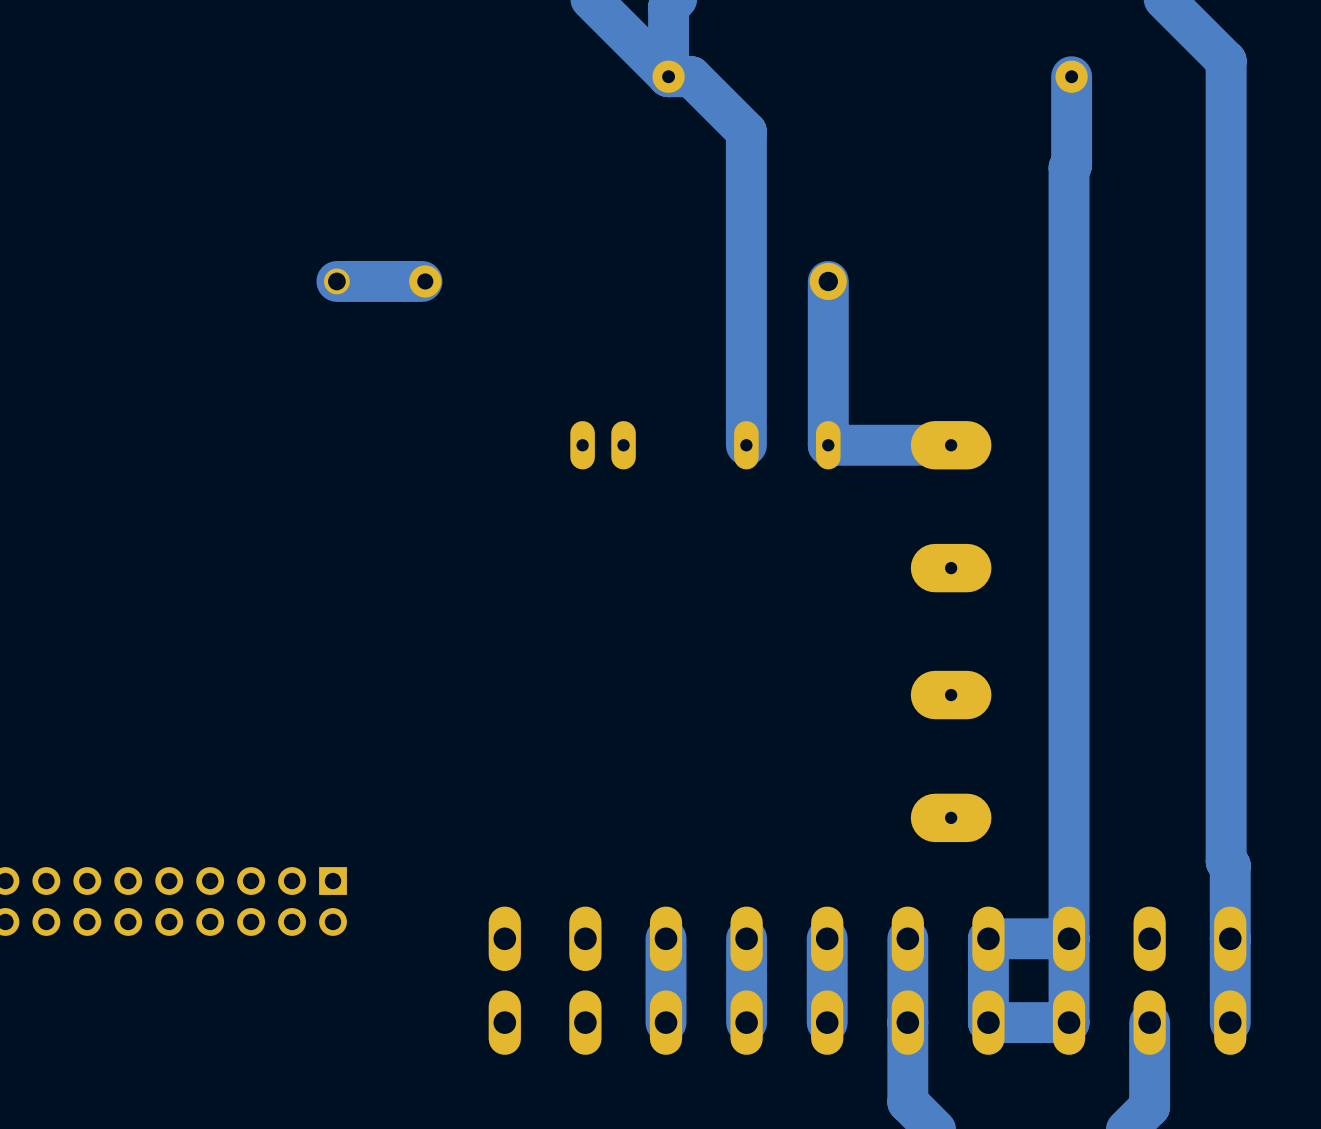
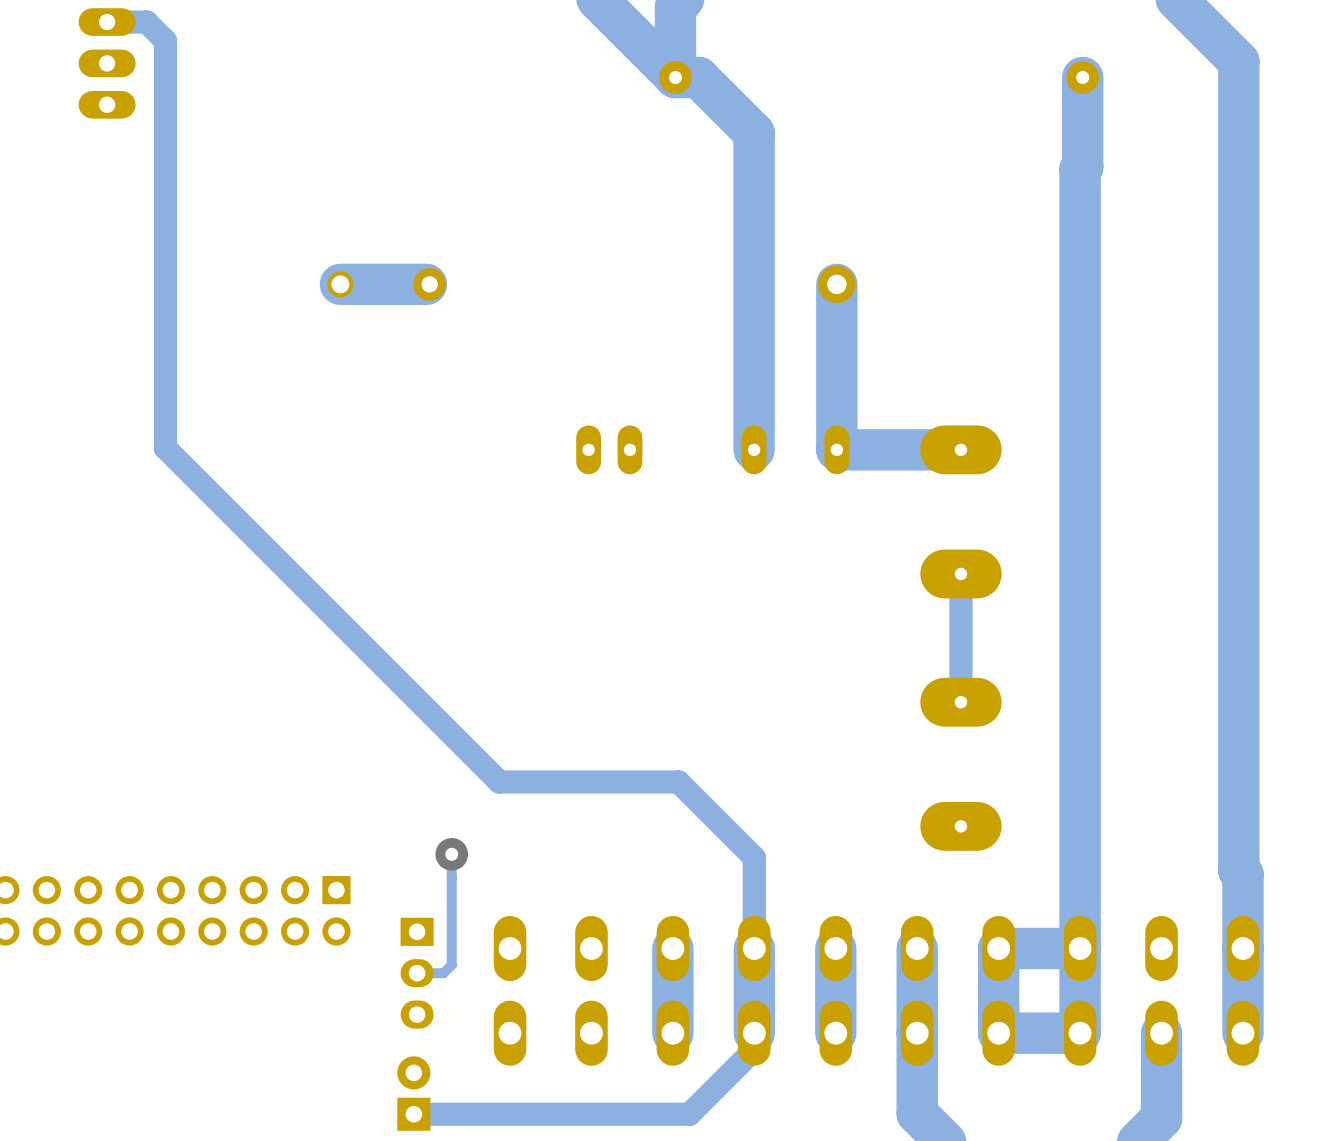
track: none -> (107, 22) (146, 22) (165, 40) (165, 448) (499, 781) (678, 781) (754, 857) (754, 948)
part: none -> (107, 63)
track: none -> (960, 573) (960, 702)
track: none -> (451, 854) (451, 965) (443, 973) (417, 973)
via: none -> (451, 854)
part: none -> (417, 973)
track: none -> (754, 1033) (754, 1049) (689, 1114) (413, 1114)
part: none -> (413, 1093)

